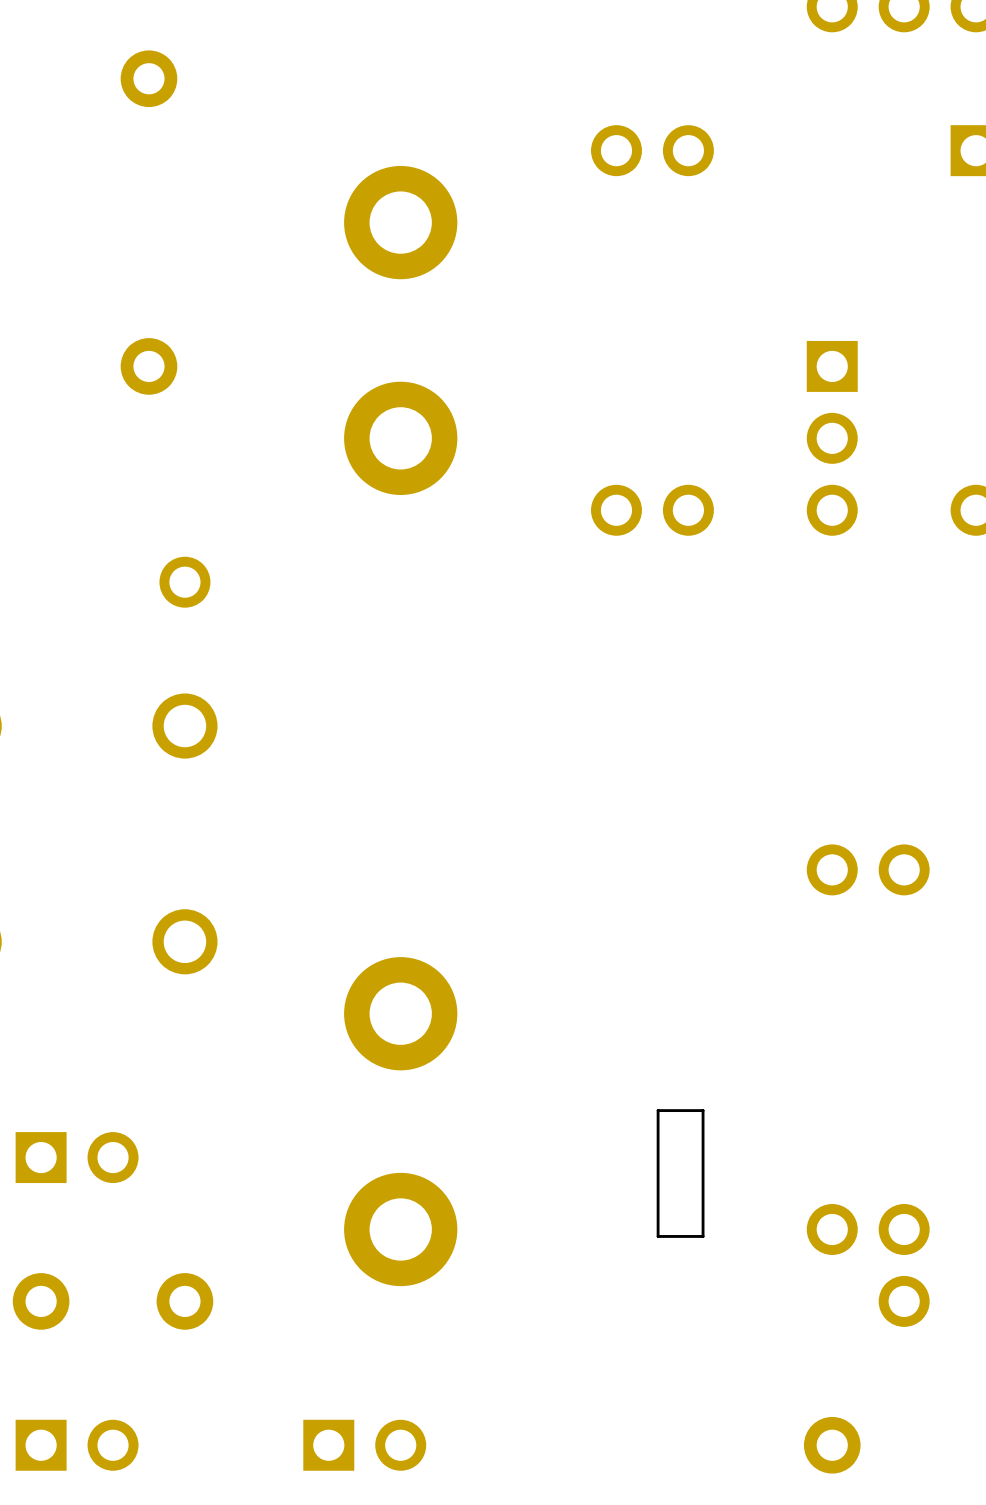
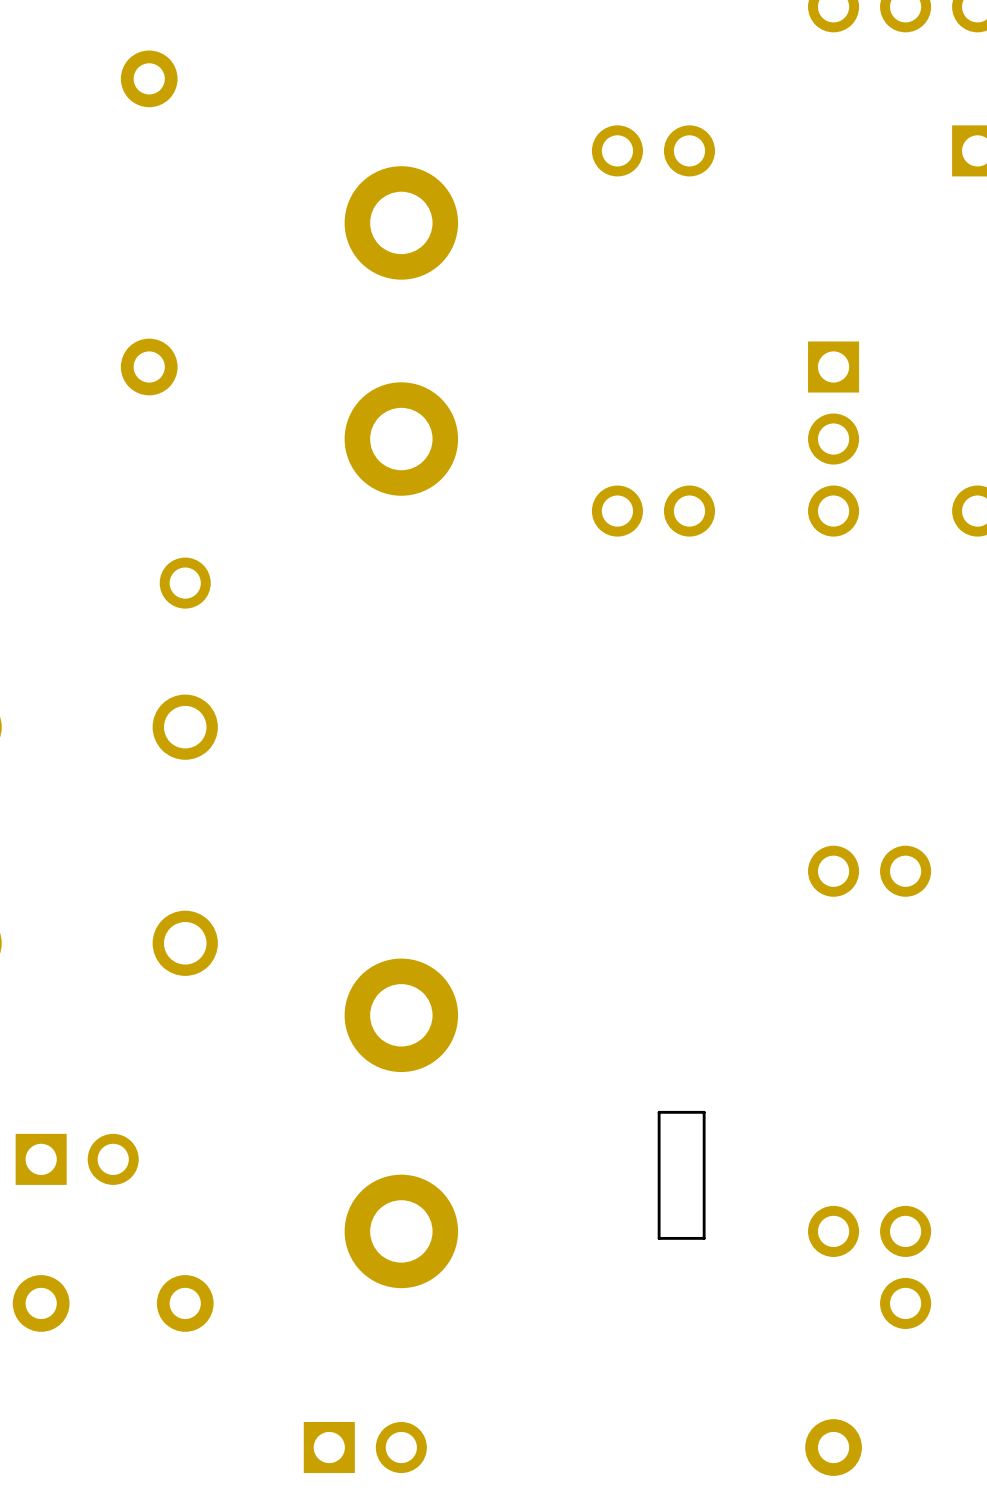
part: (77, 1445) -> none

